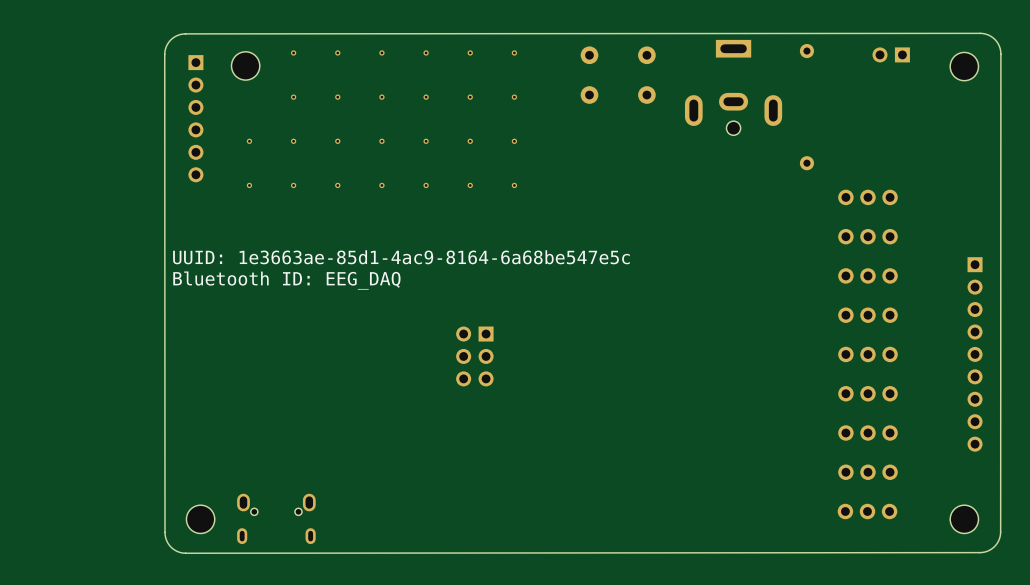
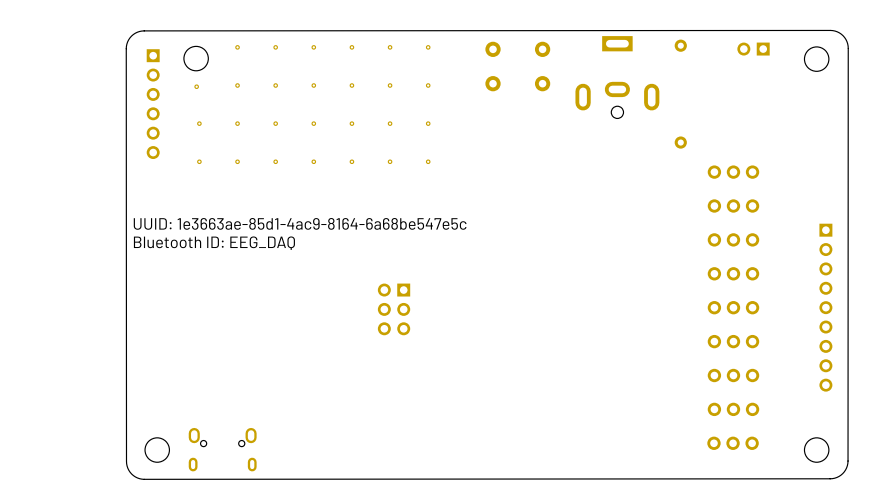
part: none -> (196, 86)

